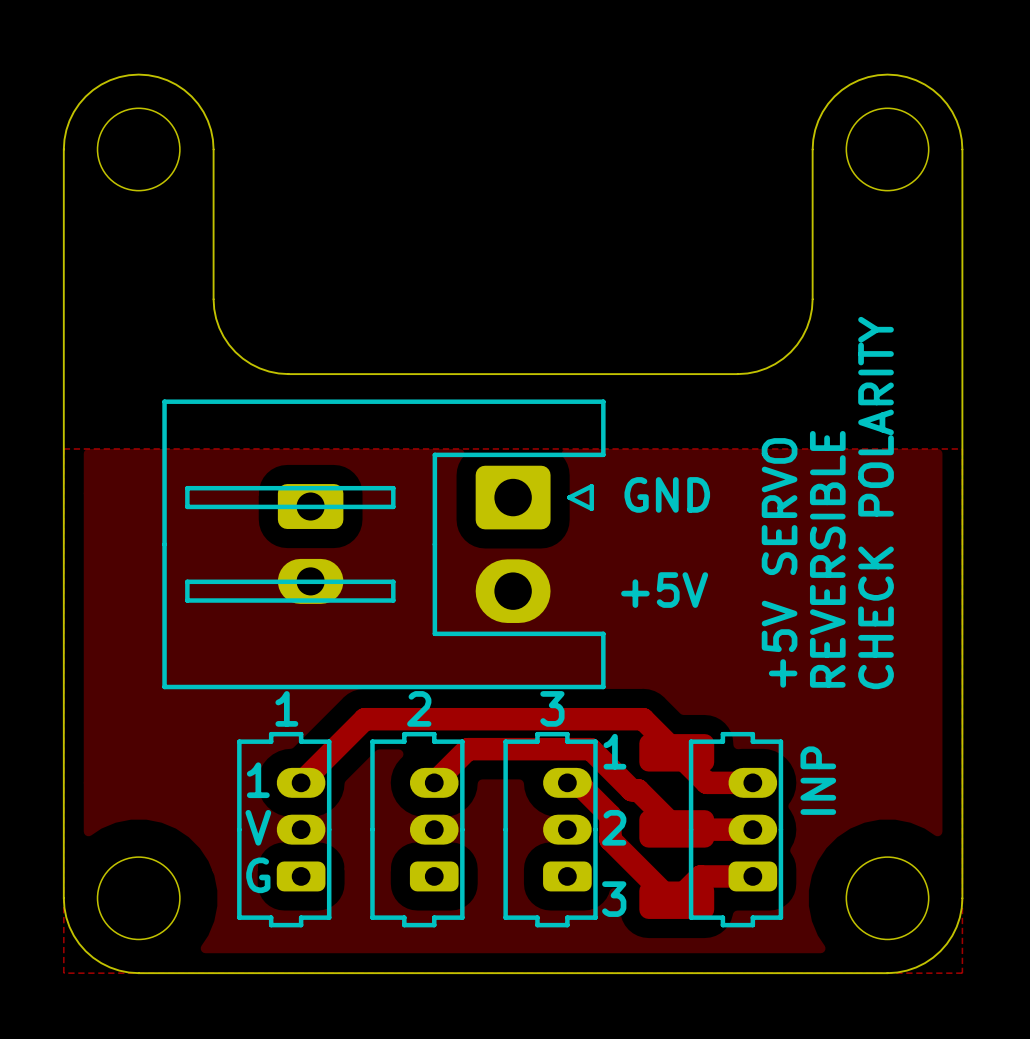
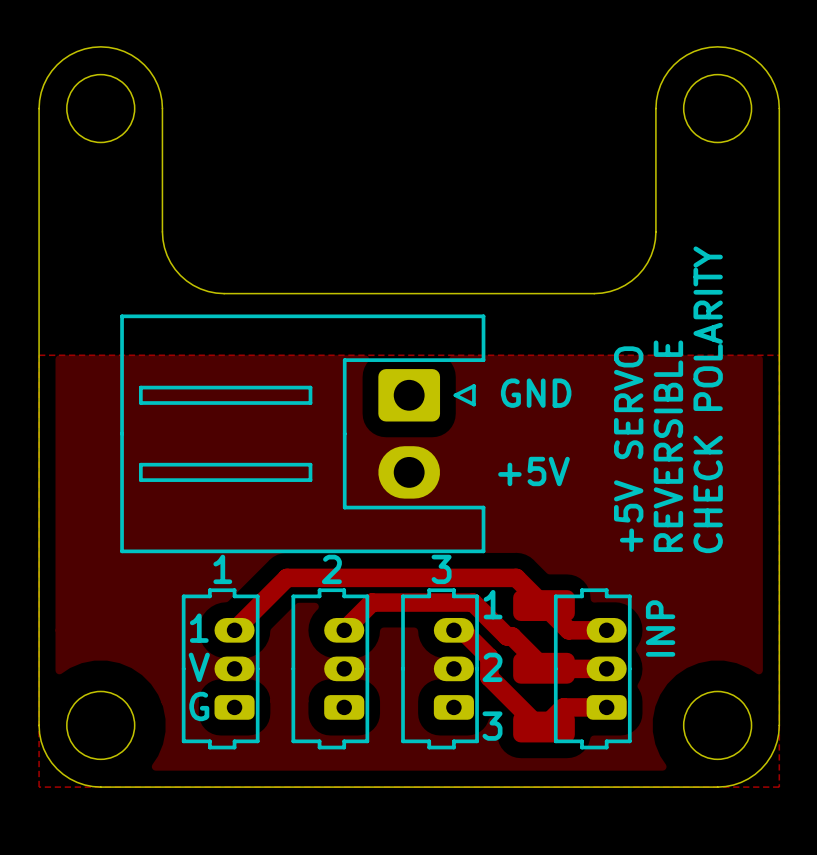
part: (310, 543) -> none

